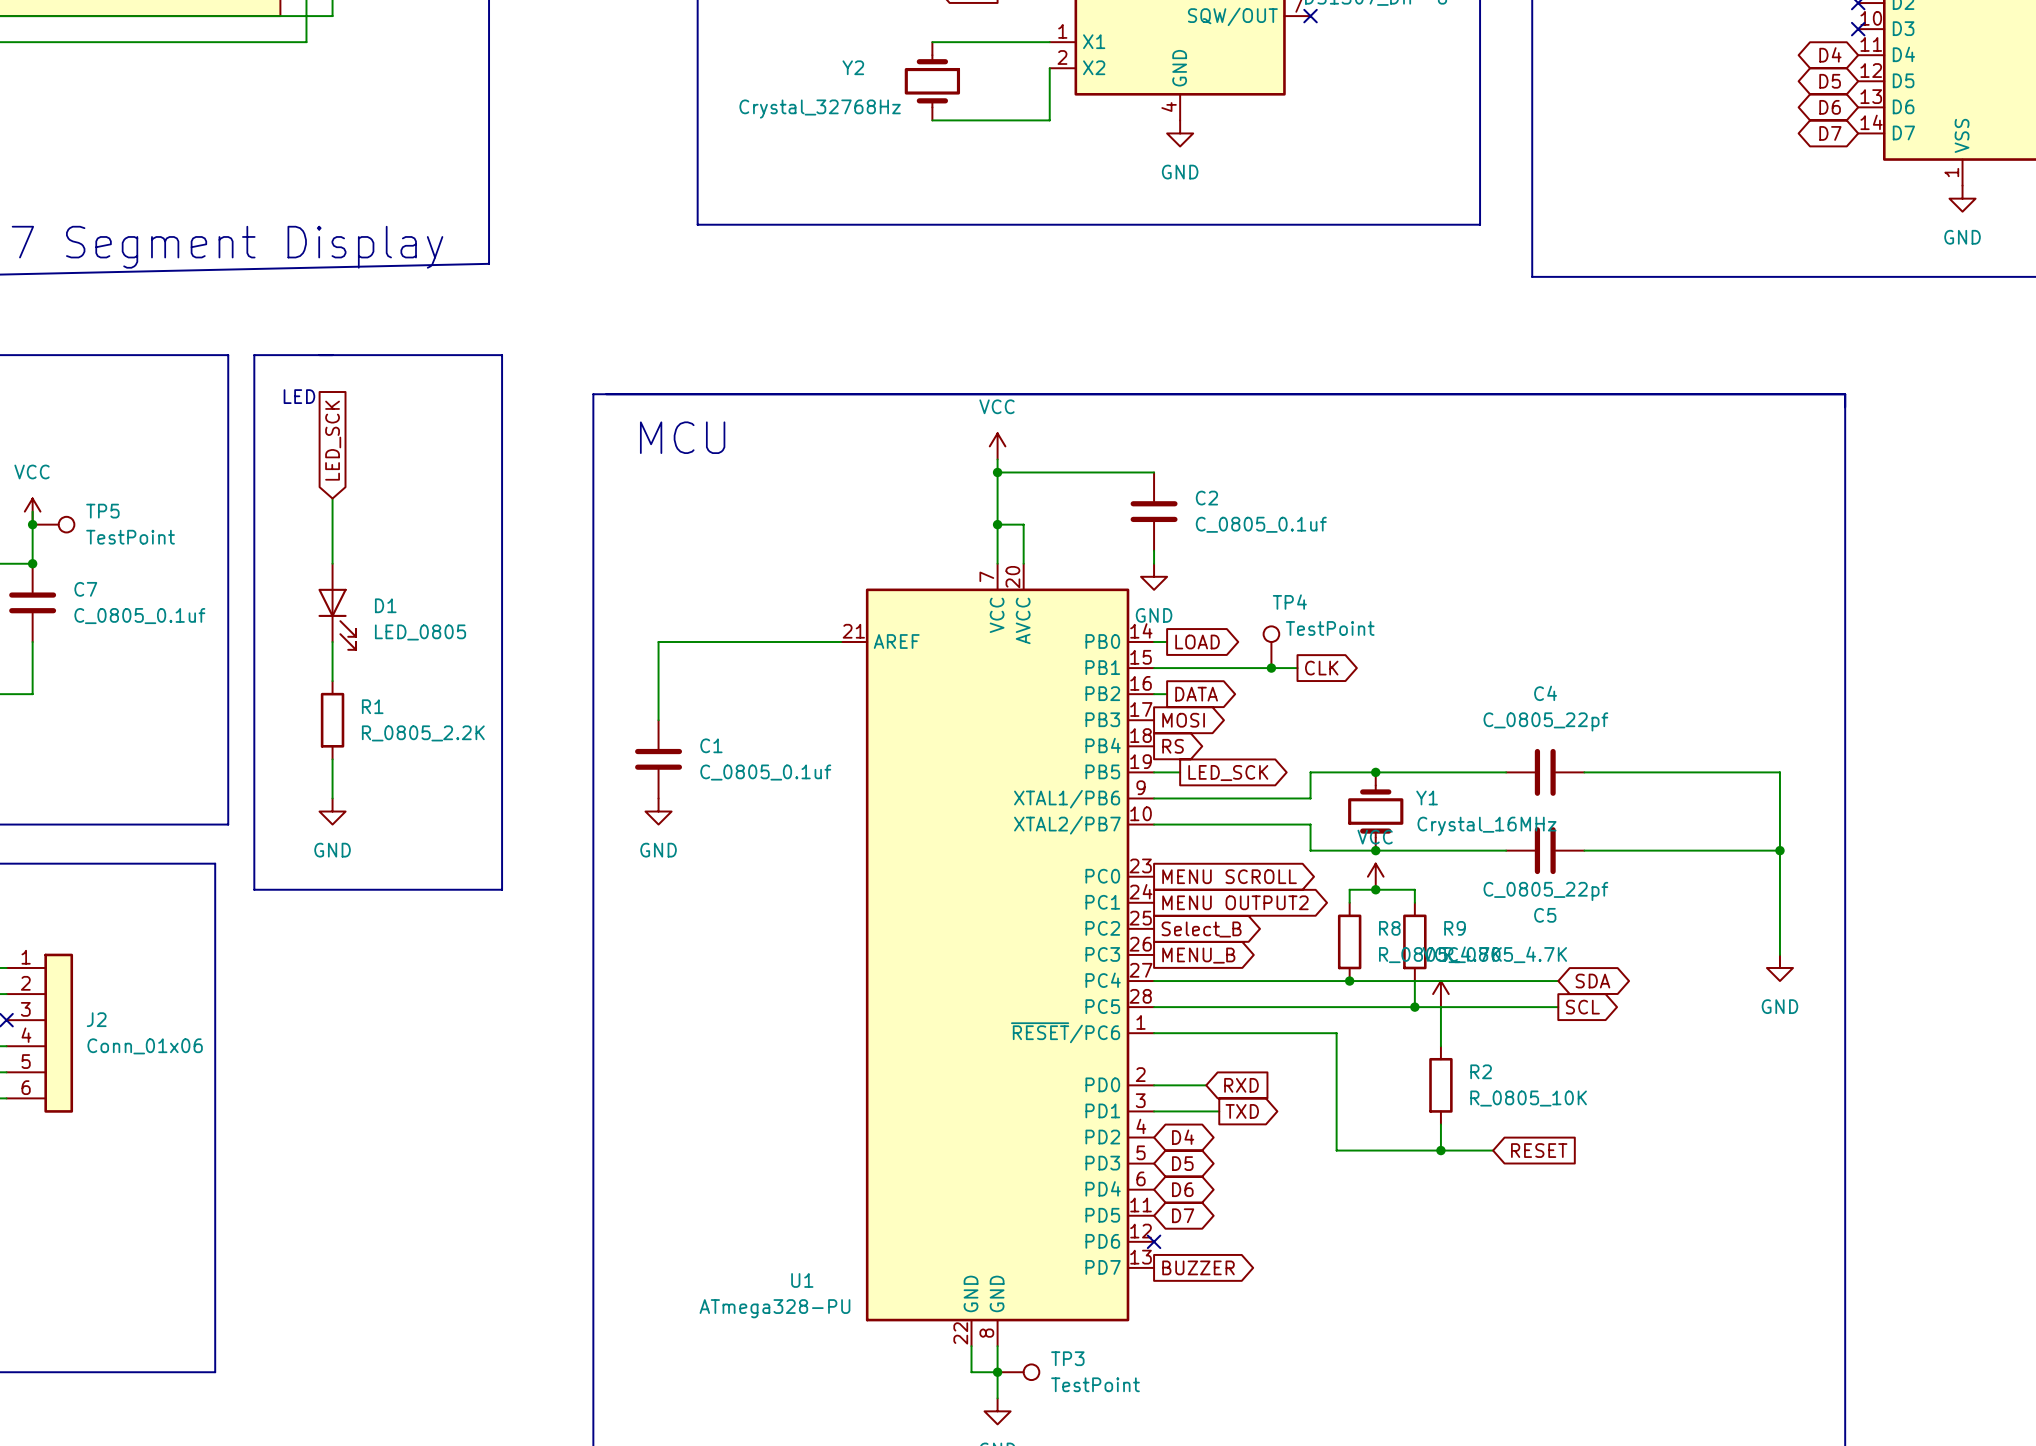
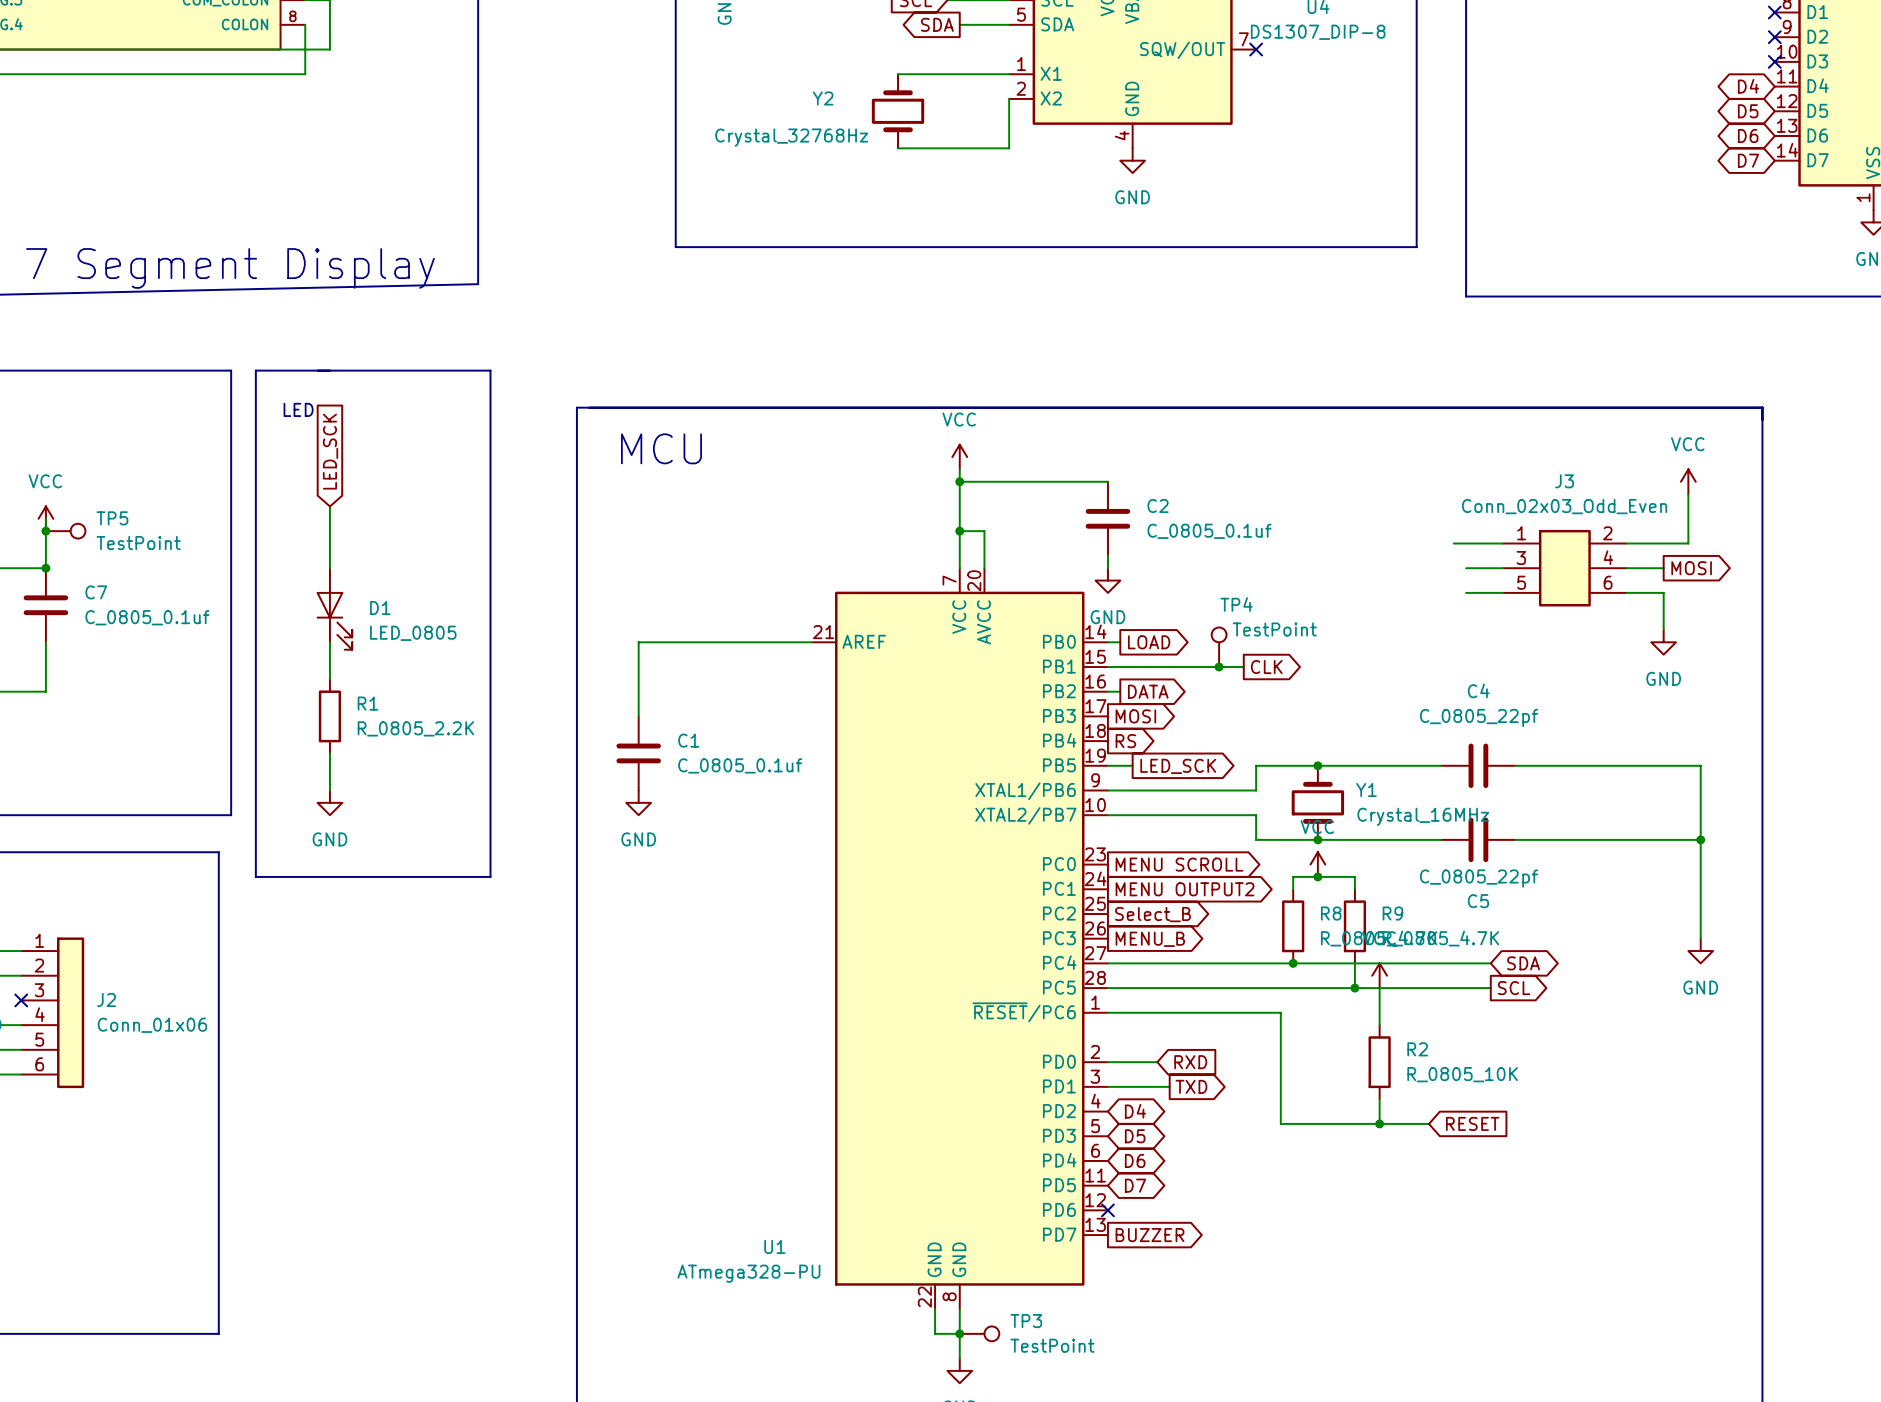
power symbol: none -> VCC (1688, 481)
wire: none -> (1688, 494) (1688, 543) (1626, 543)
wire: none -> (1453, 543) (1503, 543)
wire: none -> (1466, 568) (1503, 568)
J3: none -> Conn_02x03_Odd_Even (1564, 568)
wire: none -> (1626, 568) (1663, 568)
global label: none -> MOSI (1691, 568)
wire: none -> (1466, 592) (1503, 592)
wire: none -> (1626, 592) (1663, 592) (1663, 629)
power symbol: none -> GND (1663, 642)

